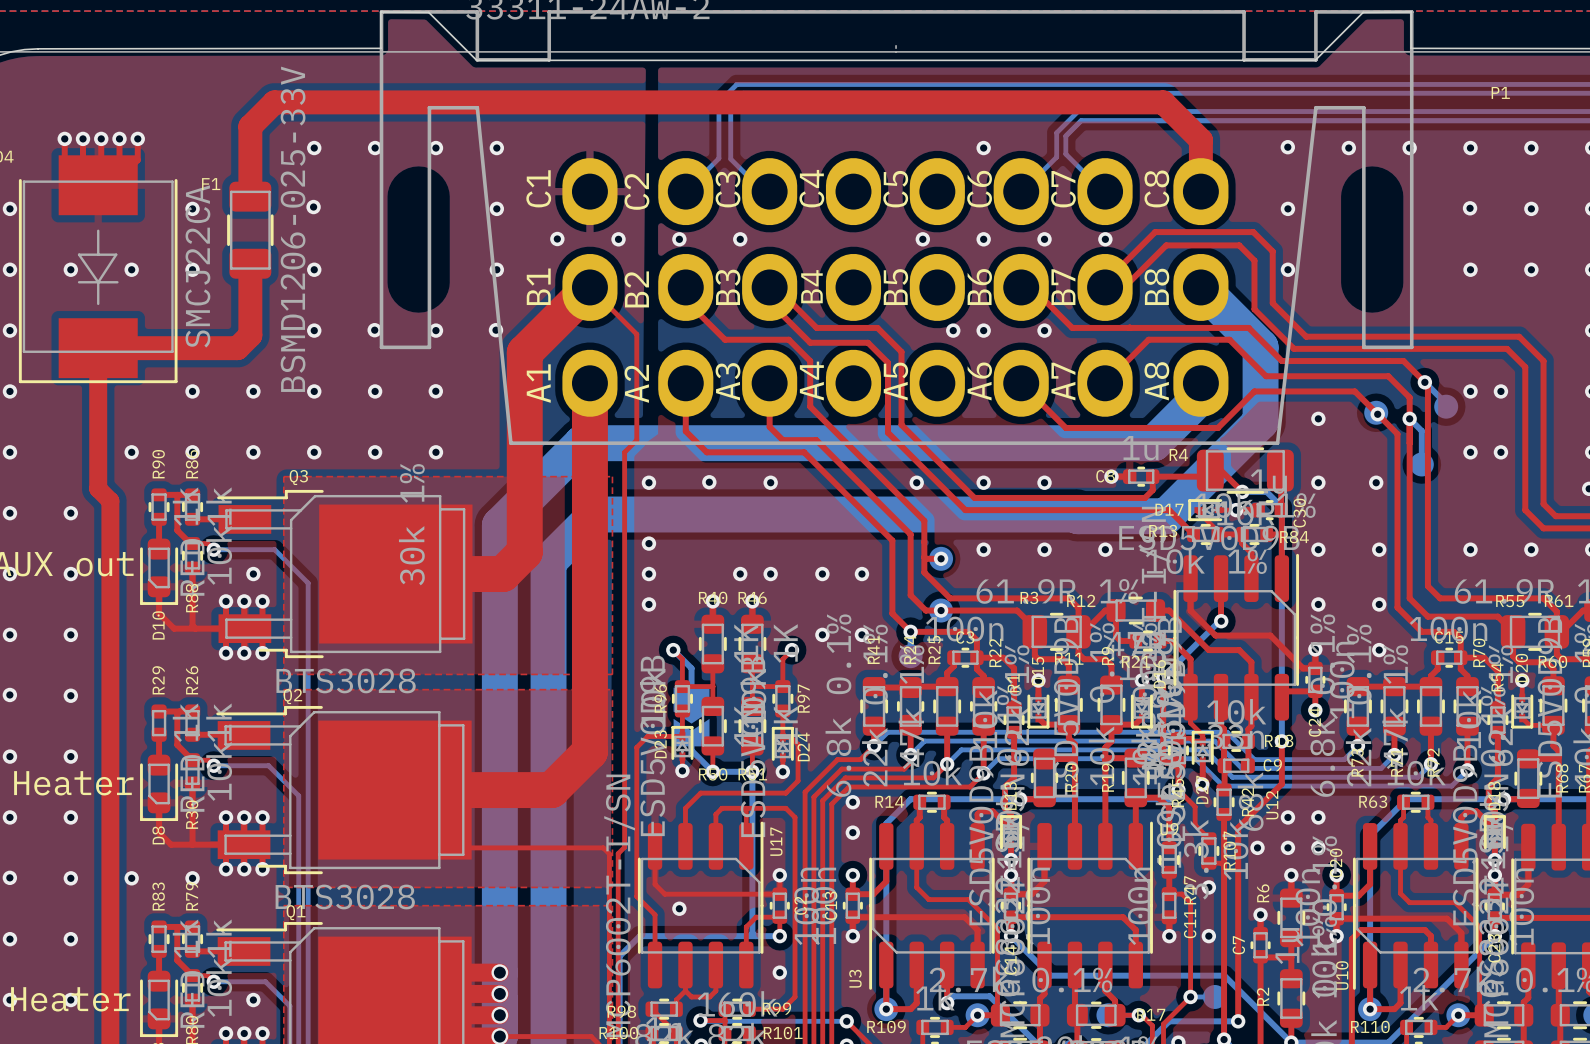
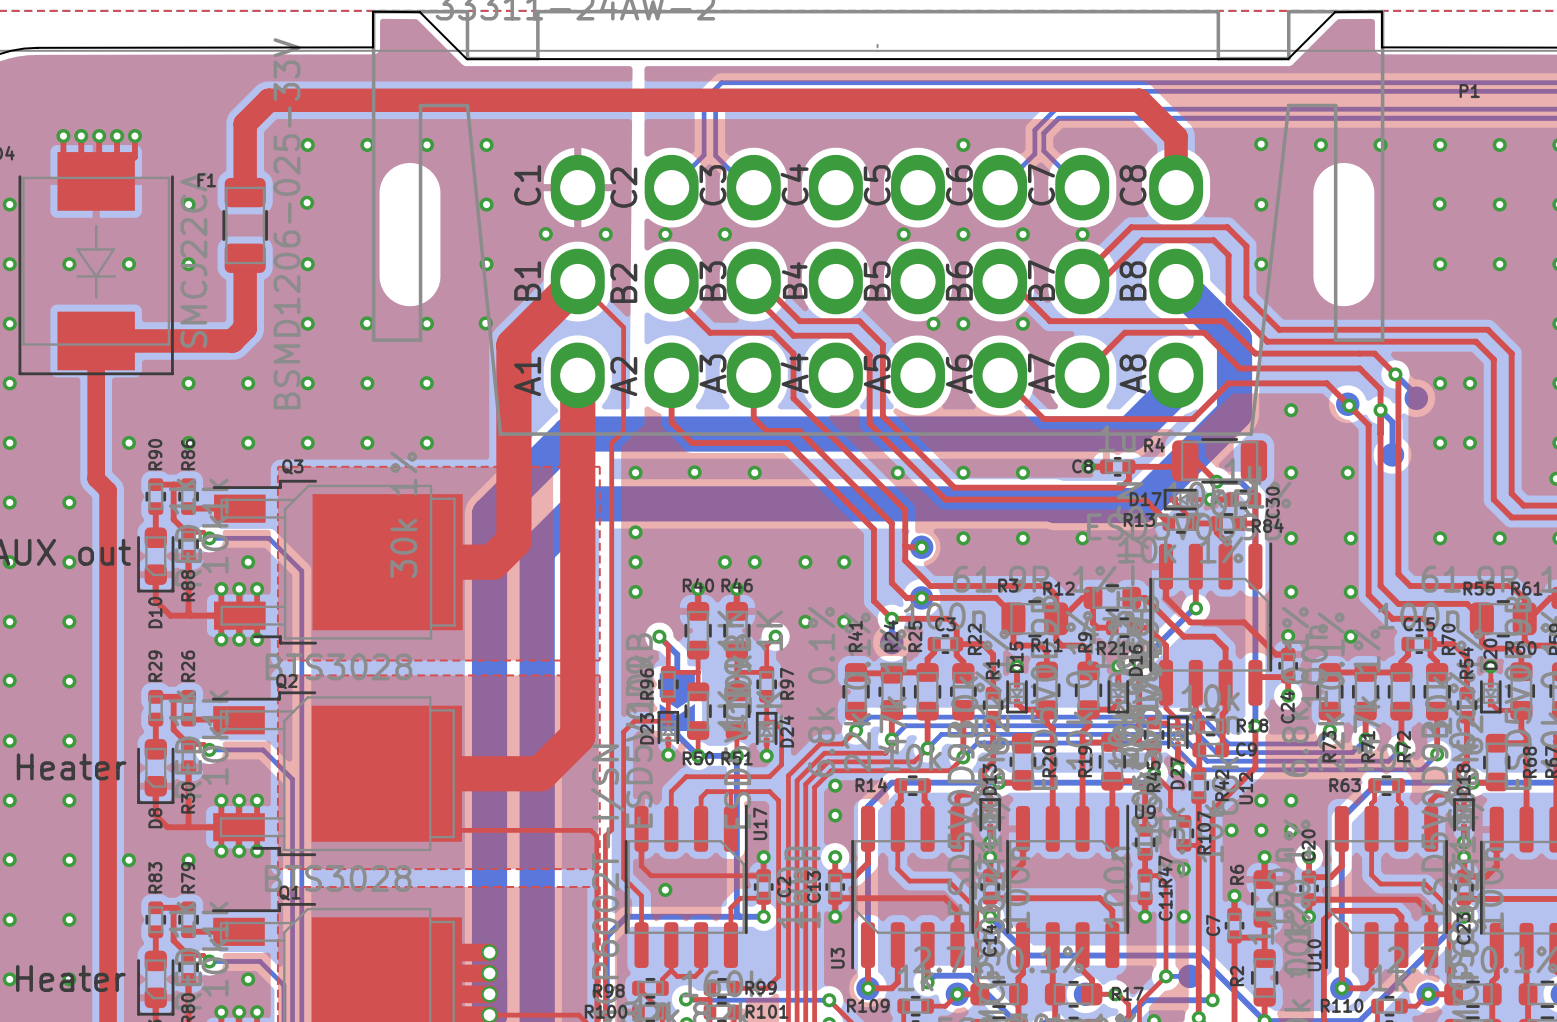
via: (779, 972) -> none

